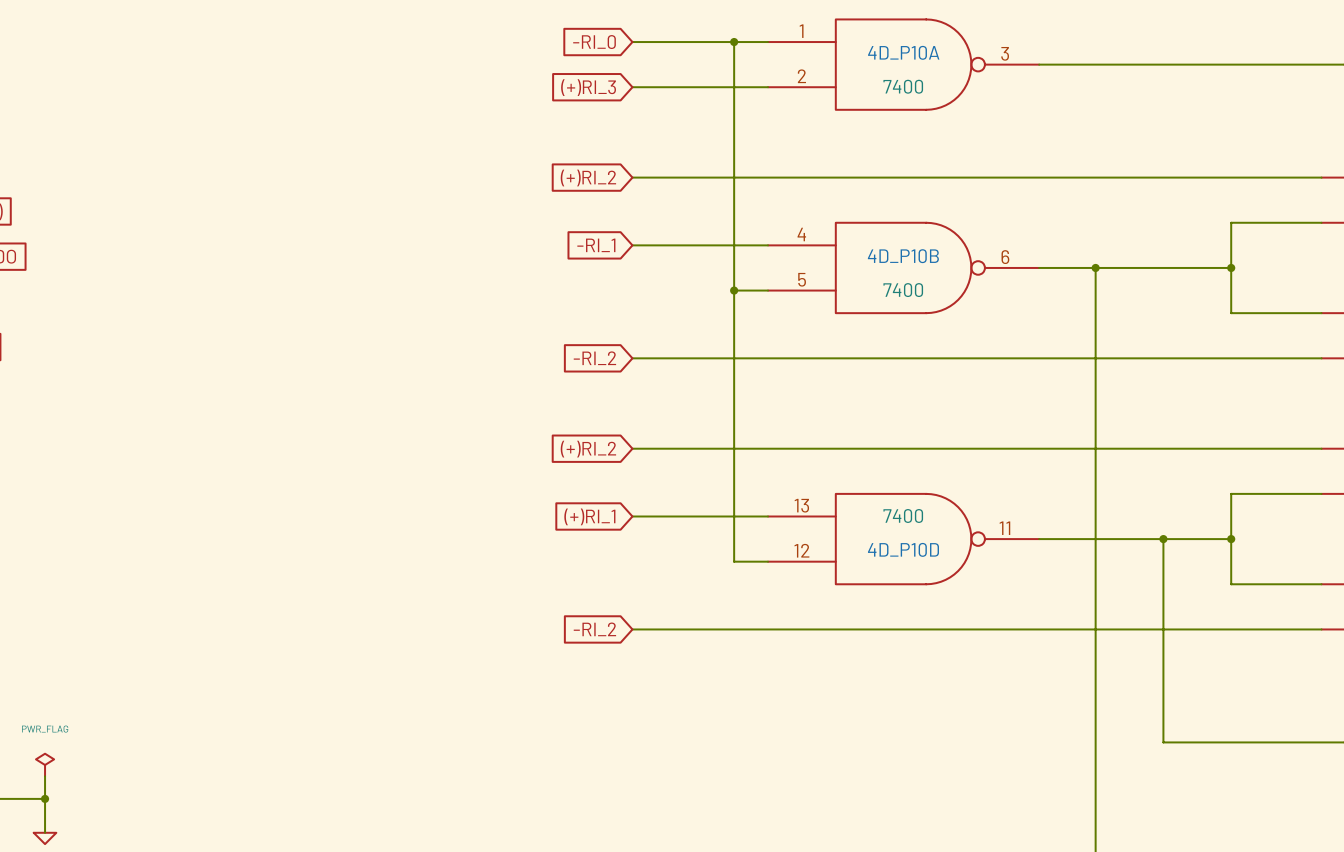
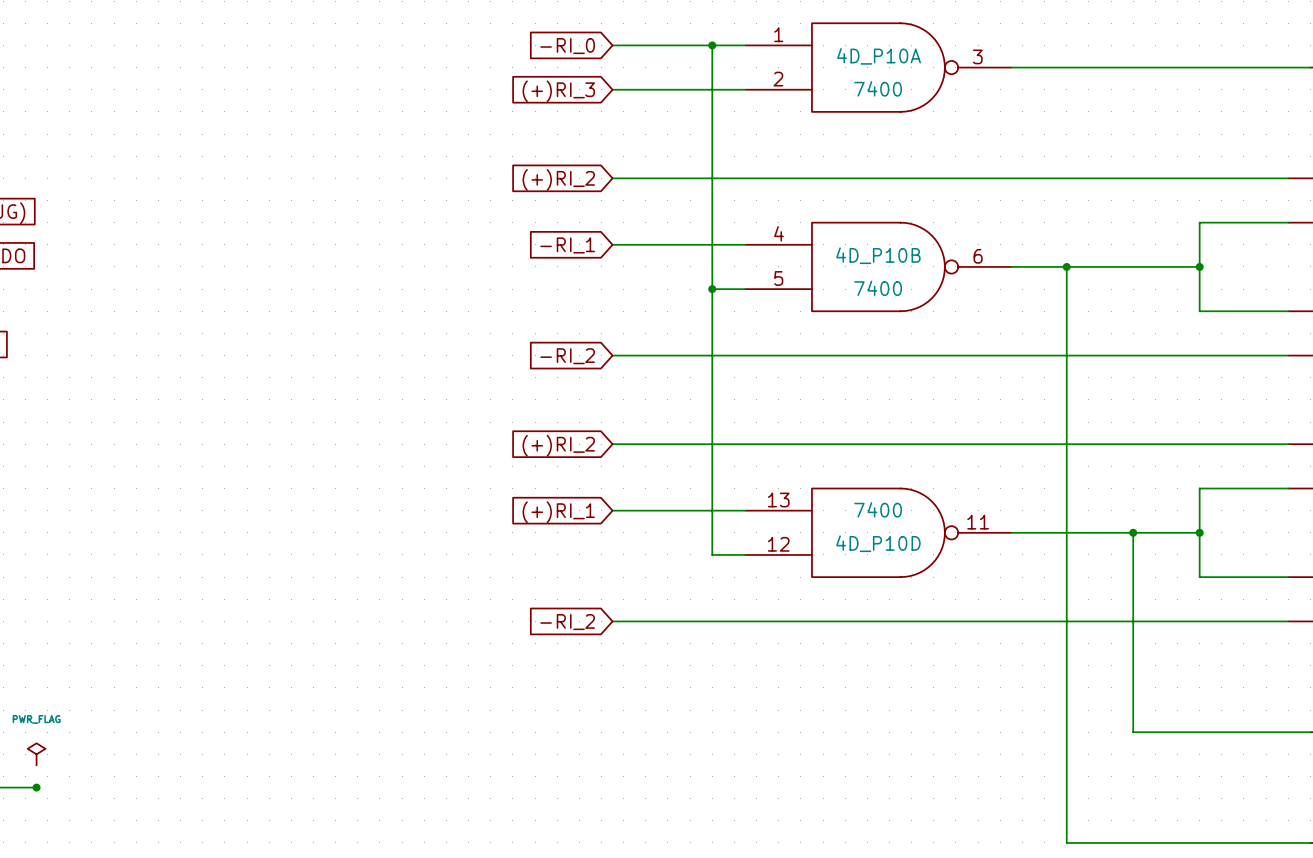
wire: (45, 776) (45, 832) -> none
power symbol: (45, 838) -> none

